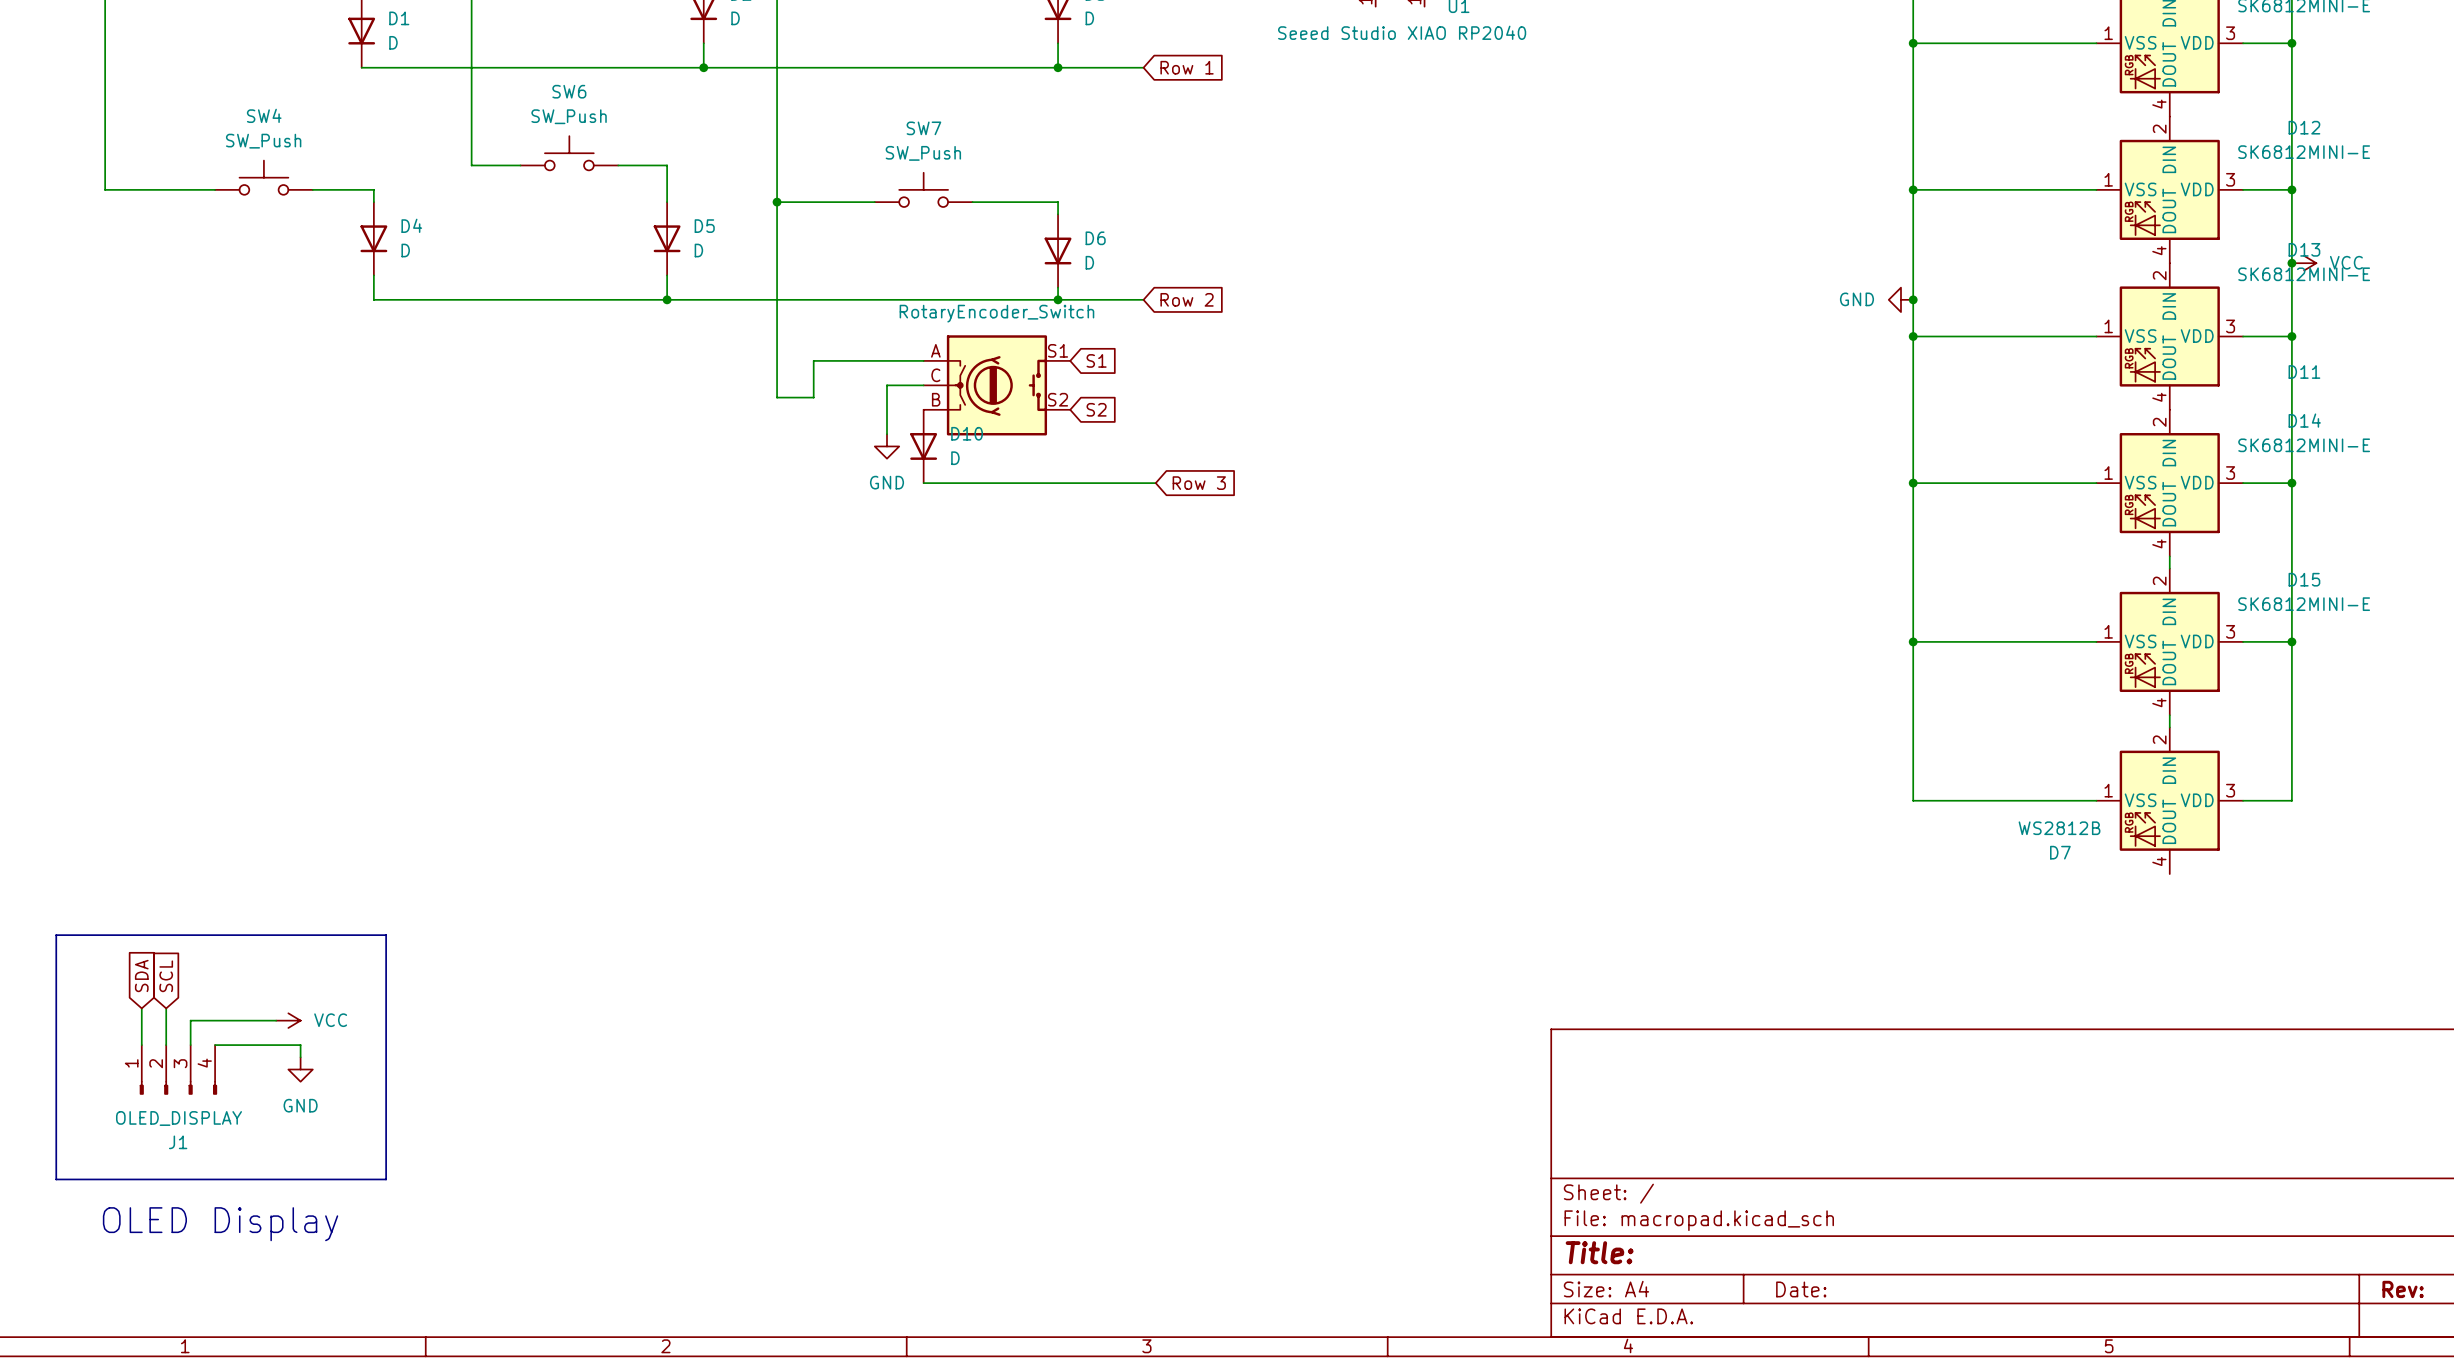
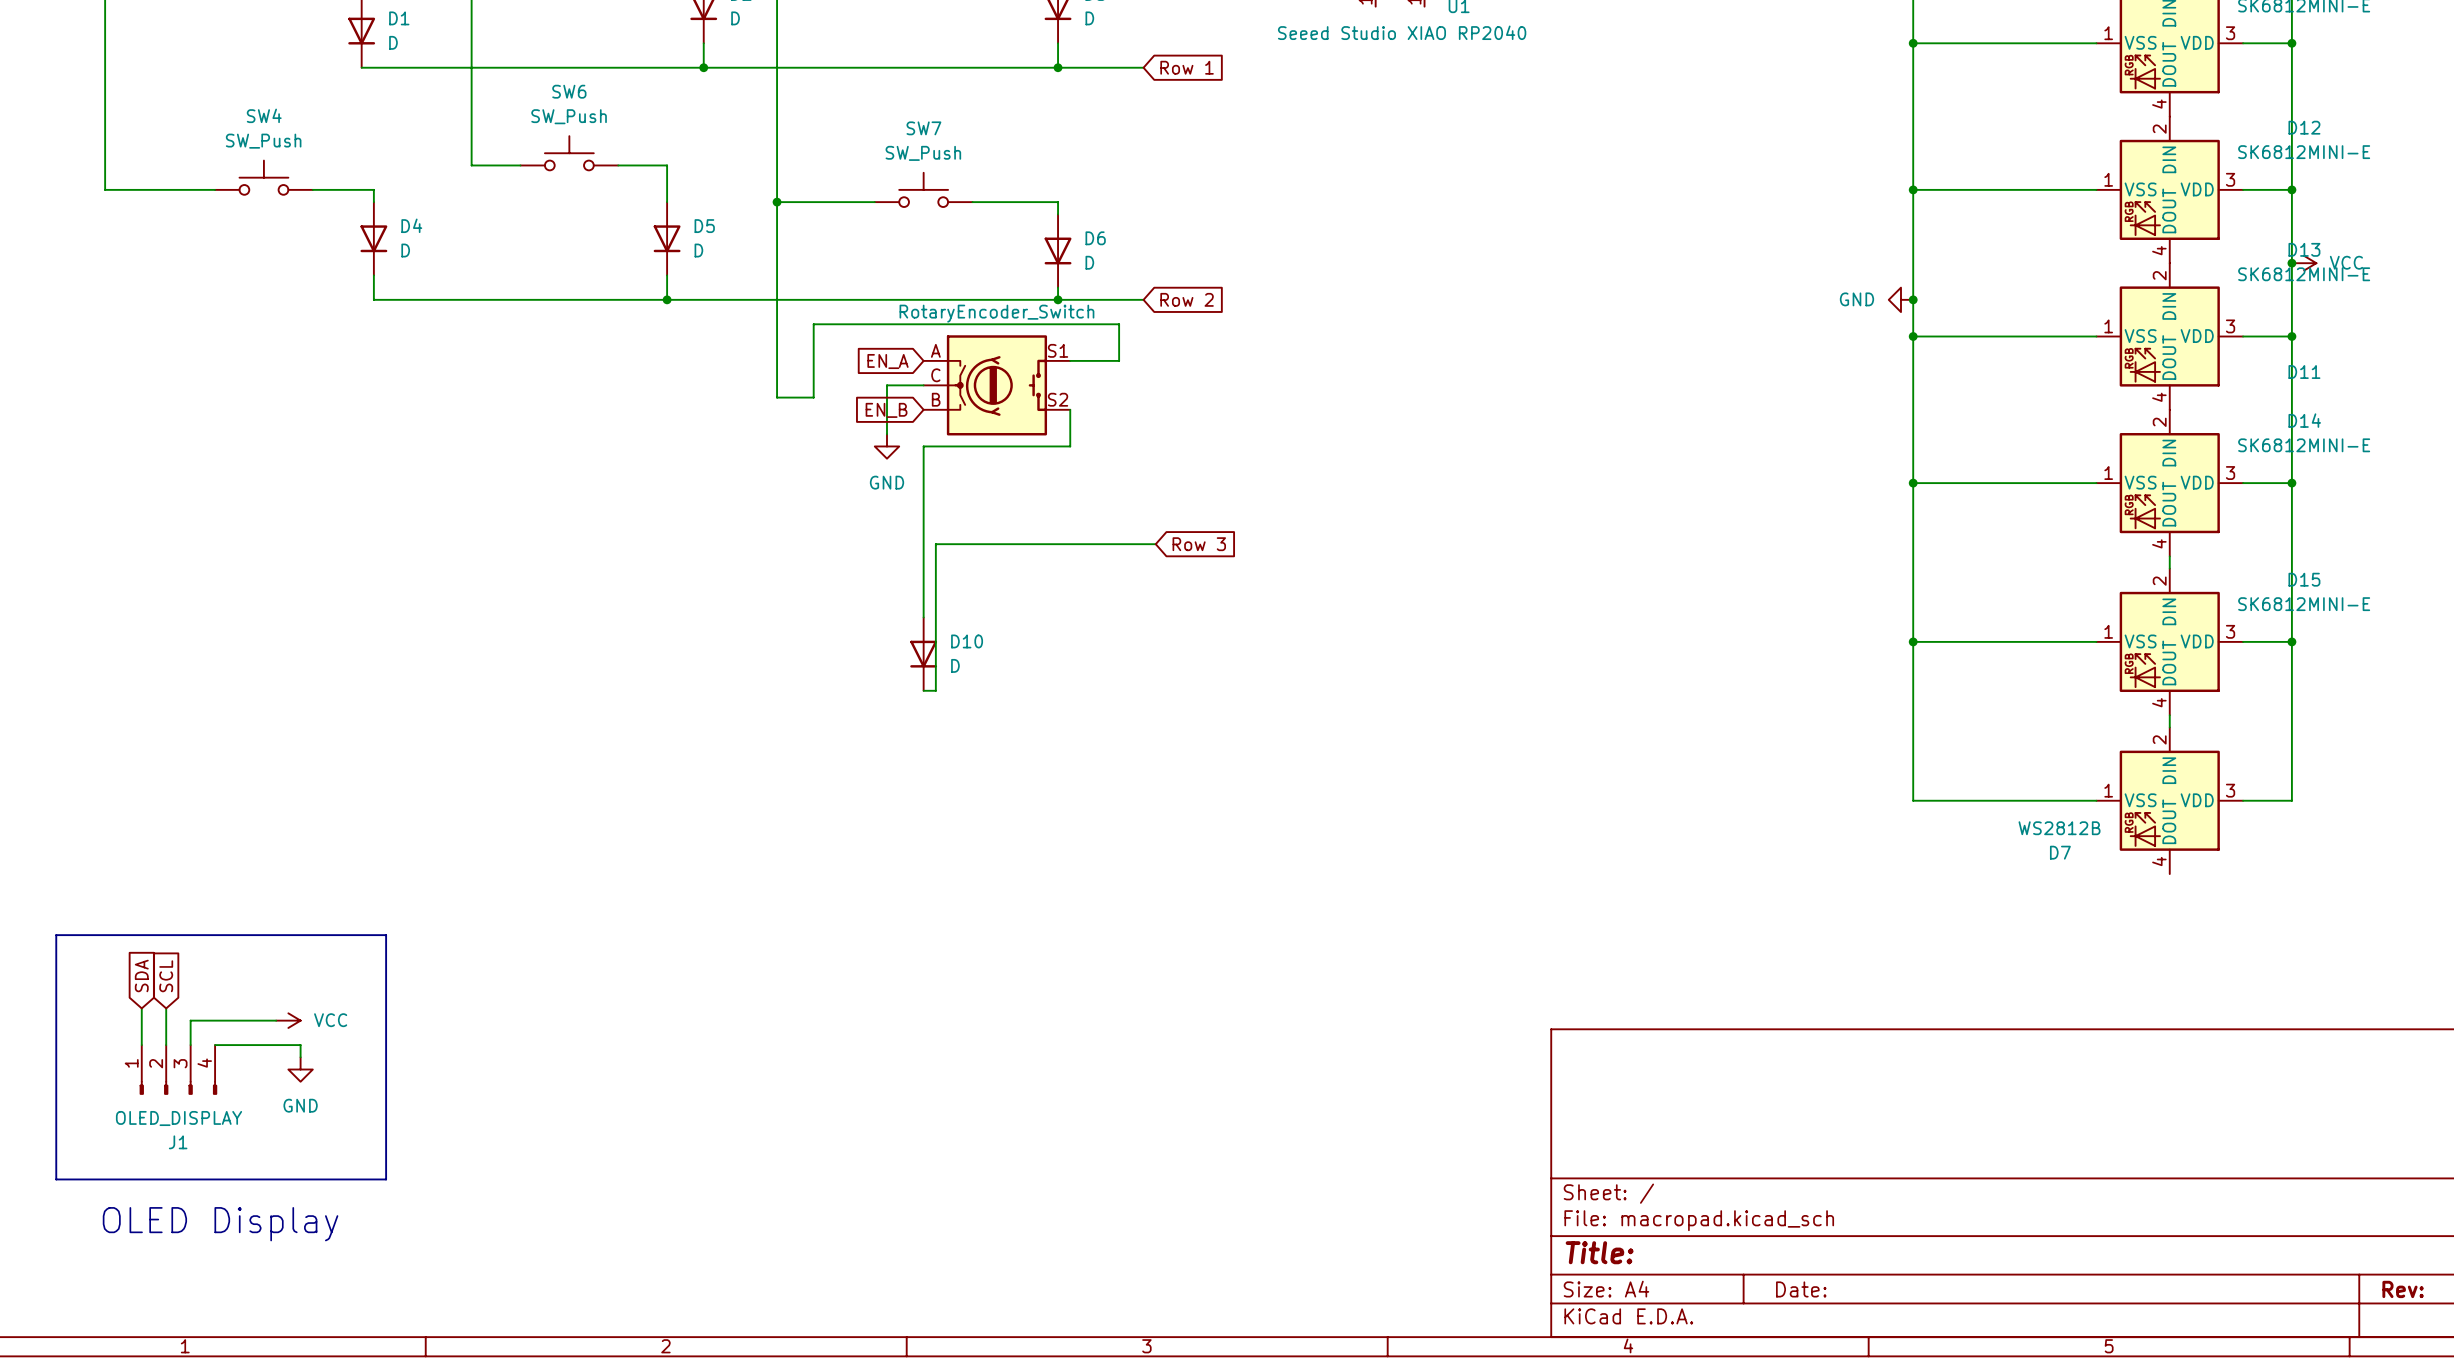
wire: (813, 360) (923, 360) -> (813, 360) (813, 324) (1119, 324) (1119, 360) (1070, 360)
global label: S1 (1096, 360) -> none
global label: none -> EN_A (887, 361)
wire: none -> (1070, 409) (1070, 446) (923, 446) (923, 617)
global label: S2 (1096, 409) -> none
global label: none -> EN_B (886, 410)
D10 position: (923, 446) -> (923, 654)
wire: (923, 483) (1155, 483) -> none
global label position: Row 3 (1199, 483) -> Row 3 (1199, 544)
wire: none -> (1155, 544) (935, 544) (935, 690) (923, 690)

